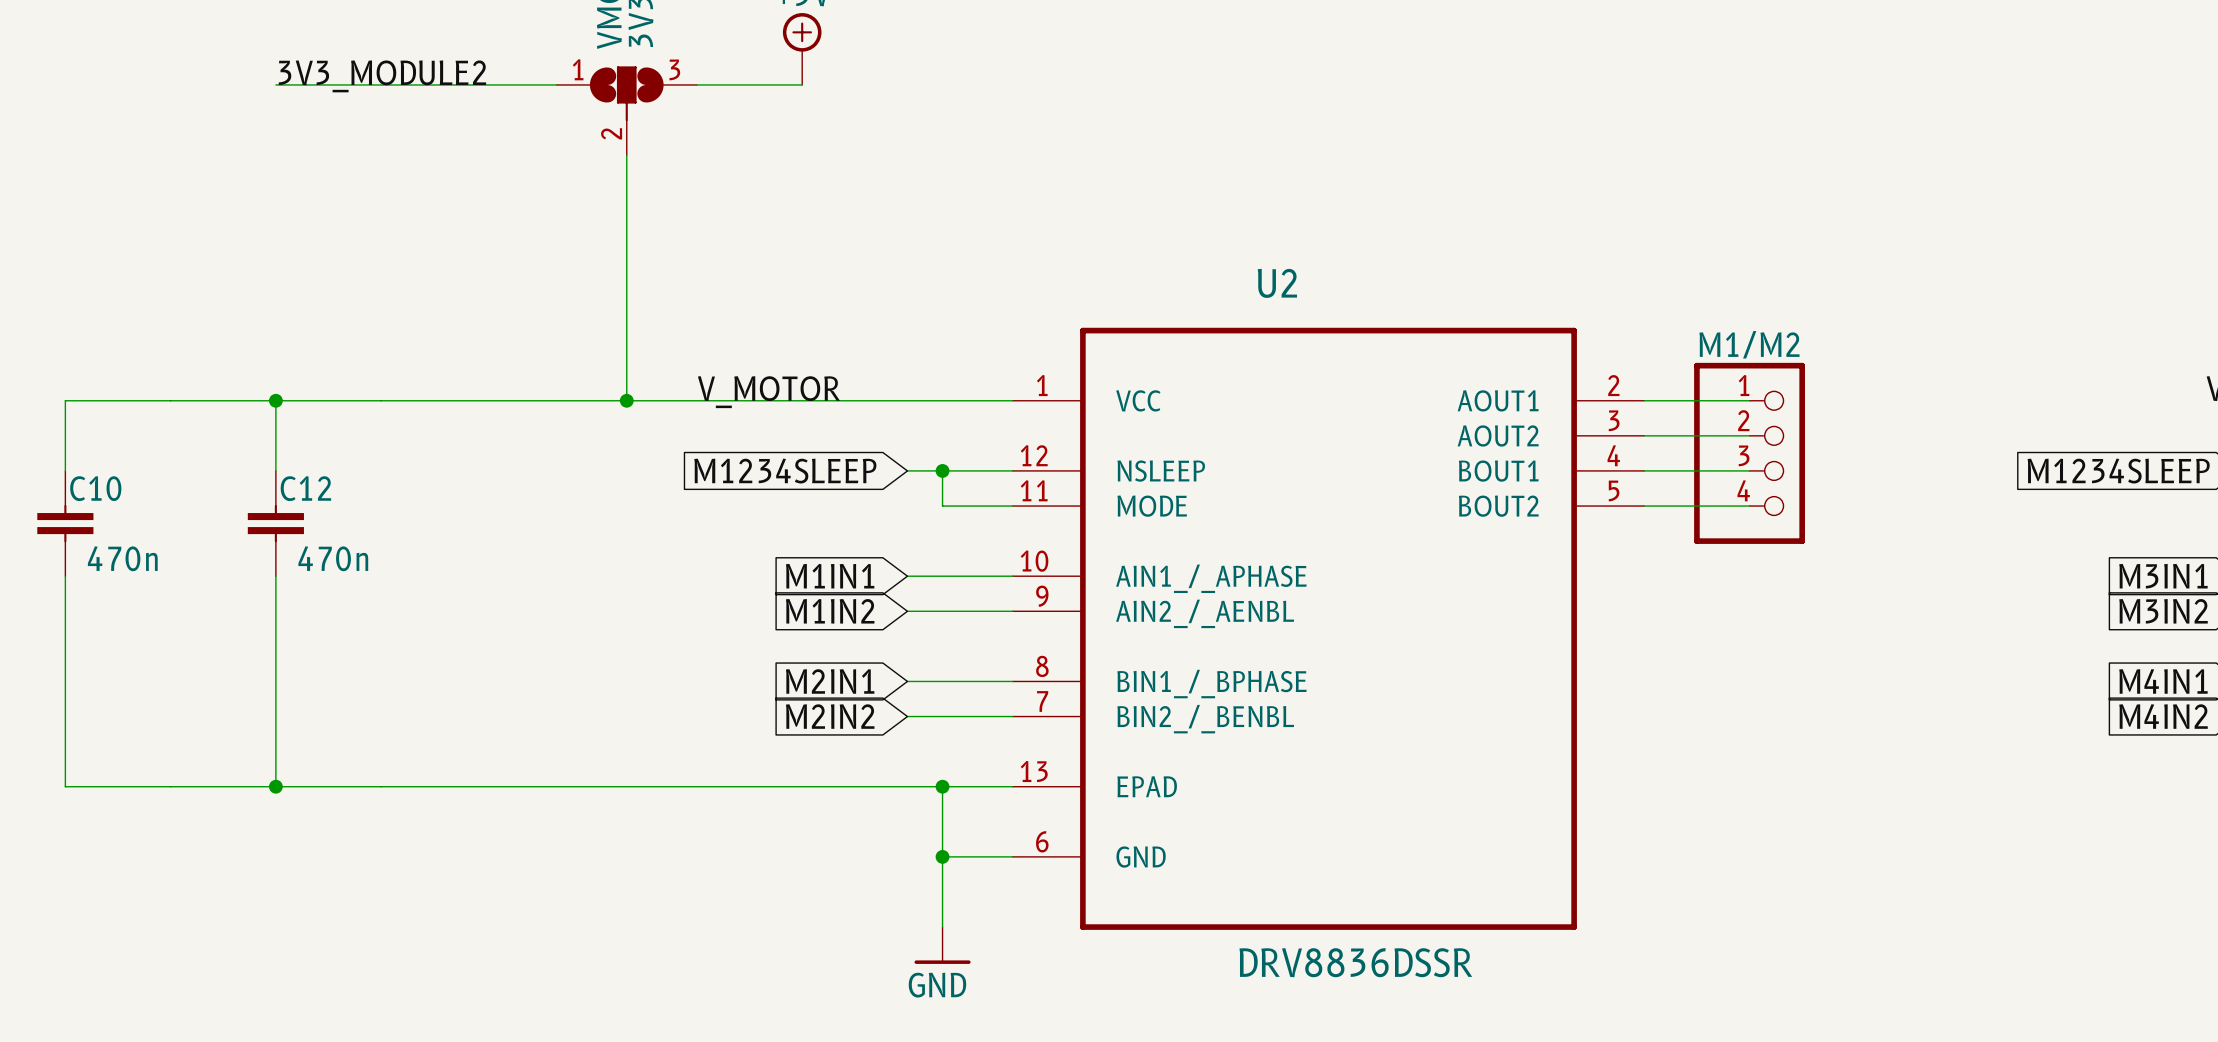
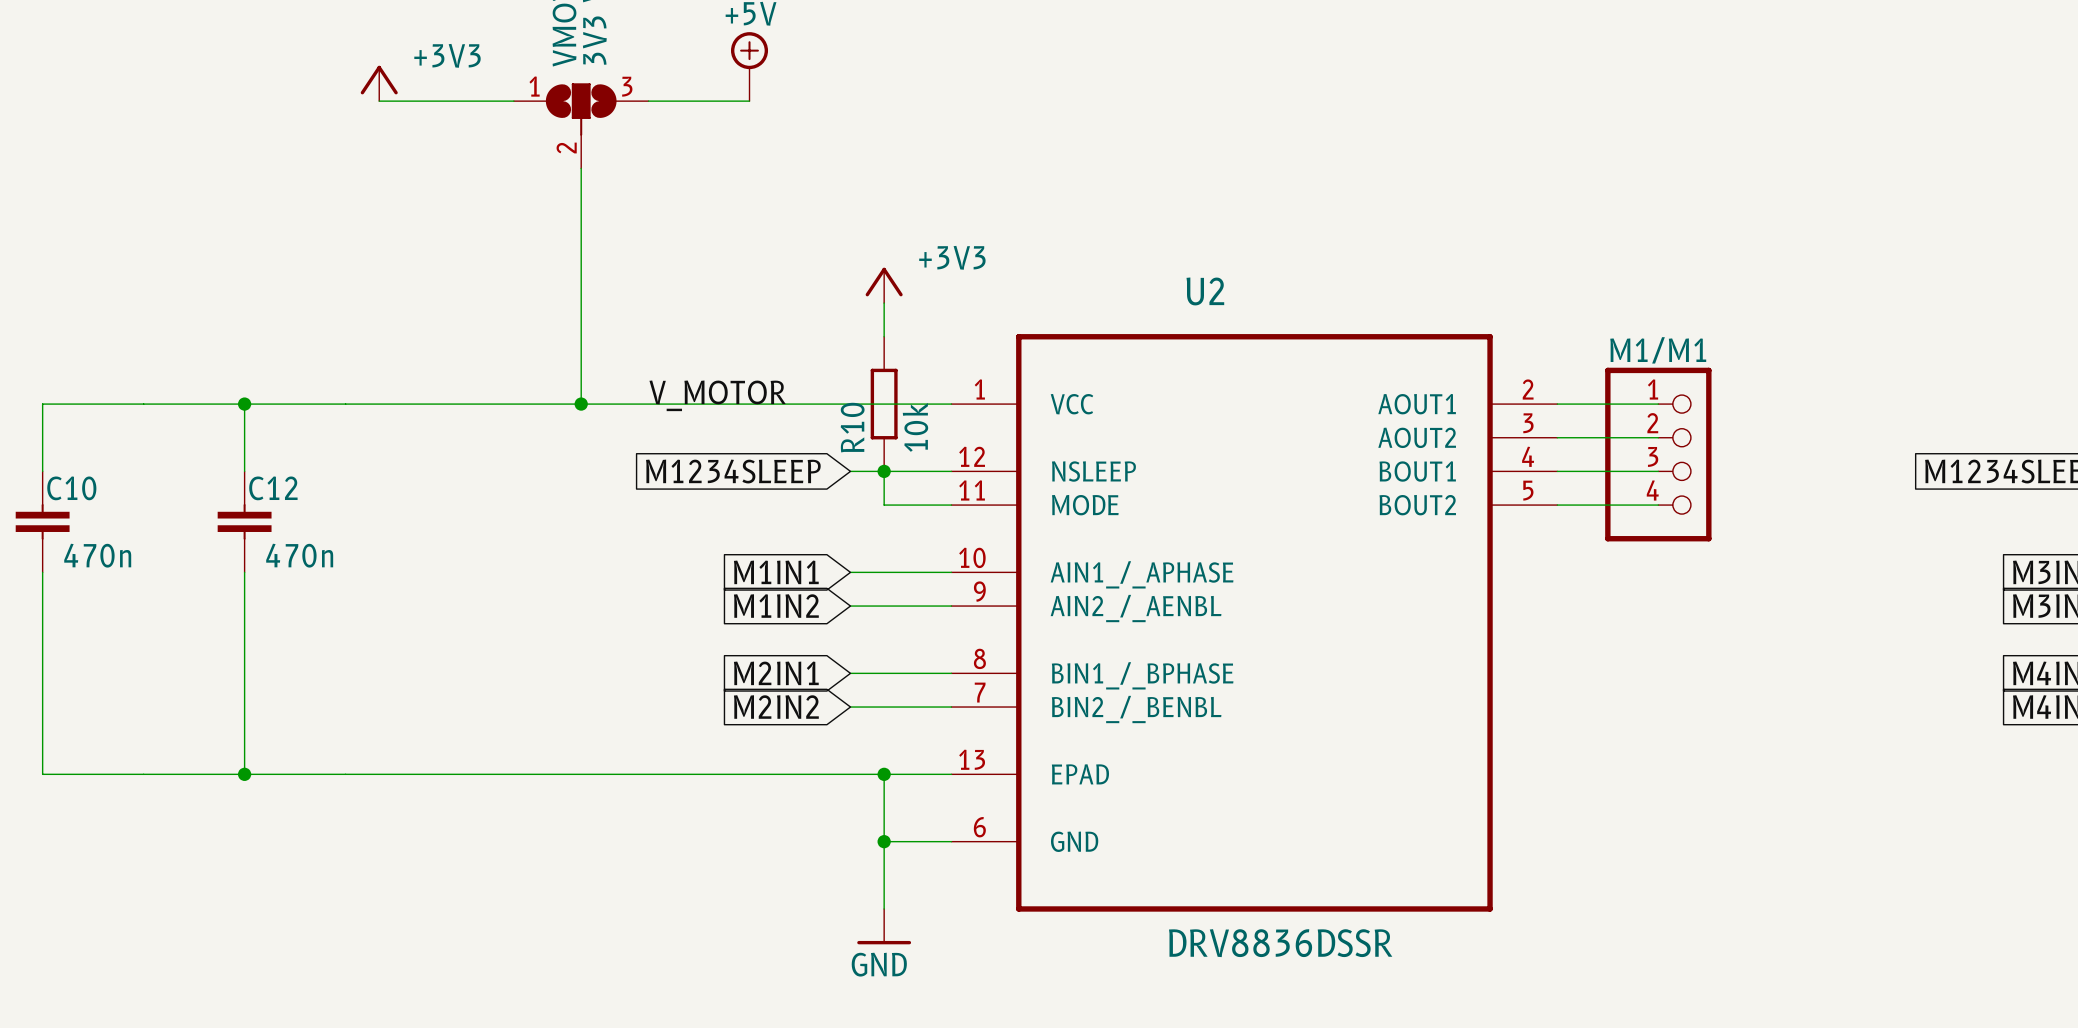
power symbol: none -> +3V3 (379, 83)
label: 3V3_MODULE2 (382, 76) -> none
wire: (275, 84) (416, 84) -> none
power symbol: none -> +3V3 (884, 285)
wire: none -> (884, 303) (884, 336)
M1/M2 name: M1/M2 (1749, 344) -> M1/M1 (1658, 350)
R10: none -> 10k (884, 404)

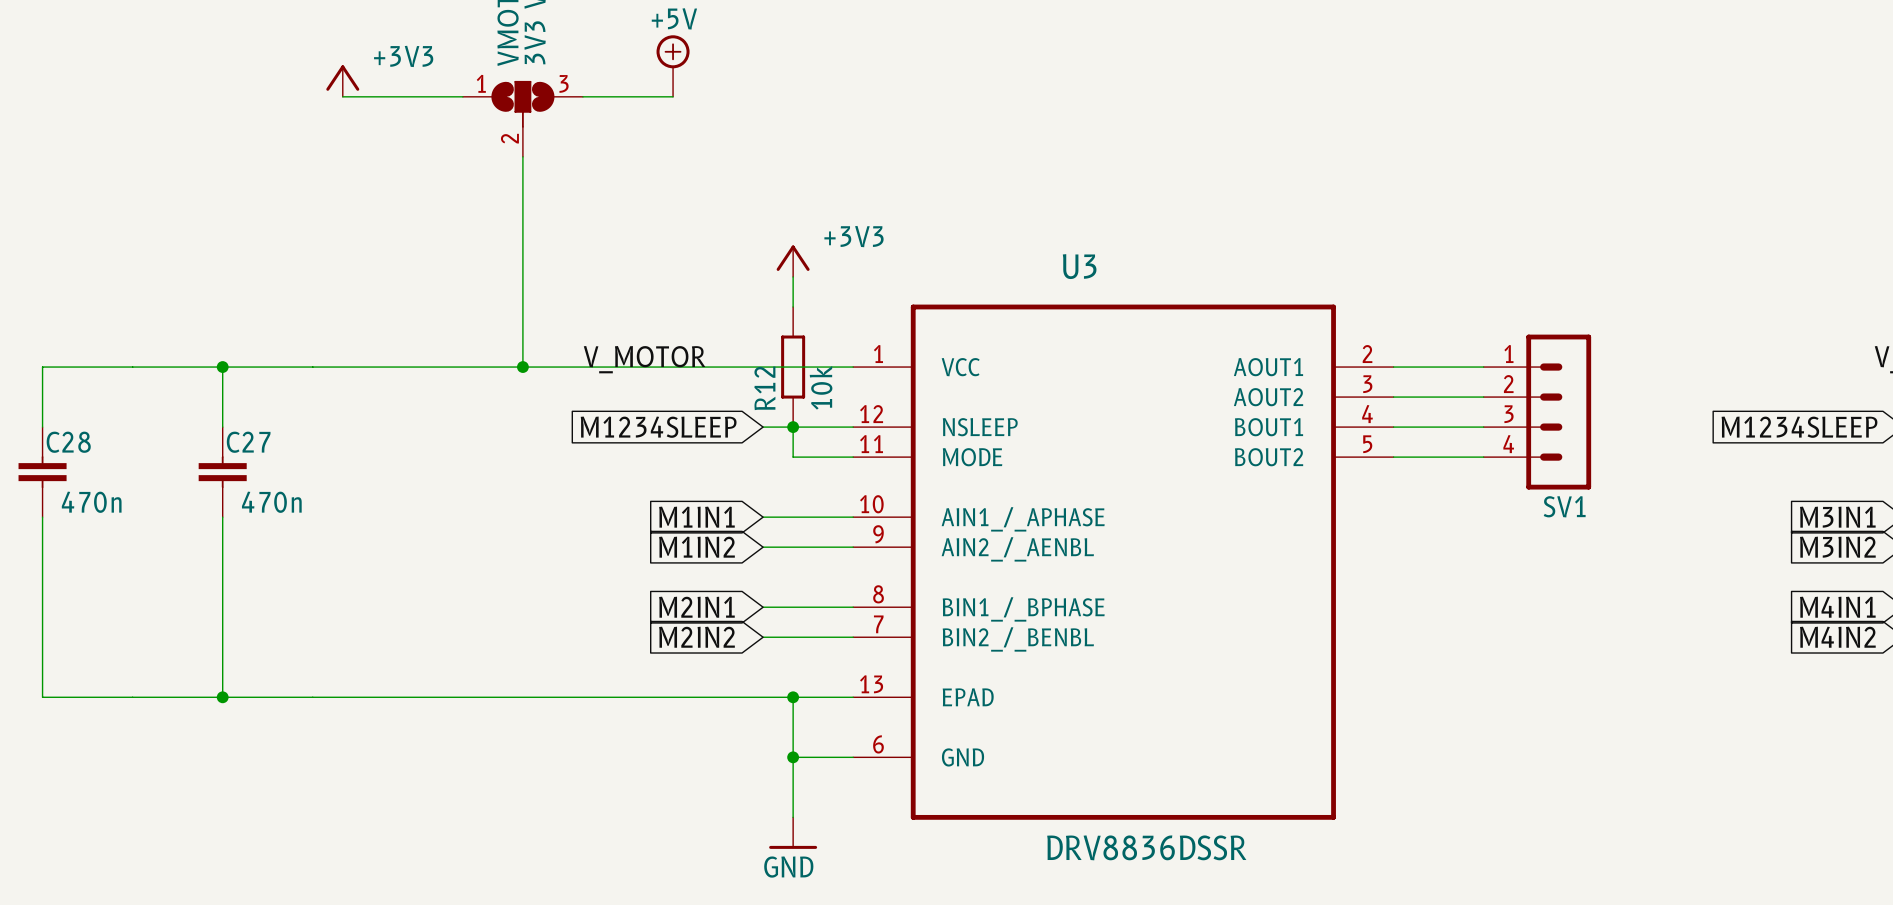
U2 name: U2 (1205, 291) -> U3 (1079, 266)
R10 name: R10 (852, 427) -> R12 (764, 388)
M1/M1: (1658, 454) -> none
SV1: none -> (1537, 412)
C10 name: C10 (71, 488) -> C28 (68, 442)
C12 name: C12 (273, 488) -> C27 (248, 442)

